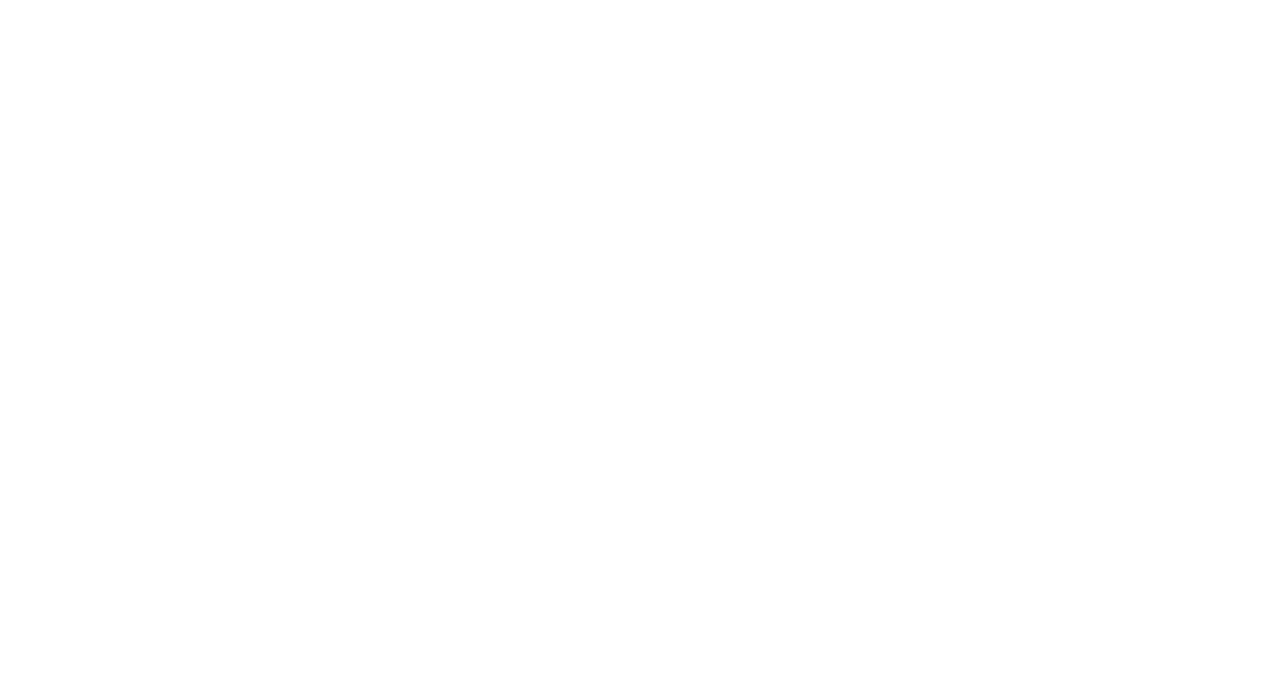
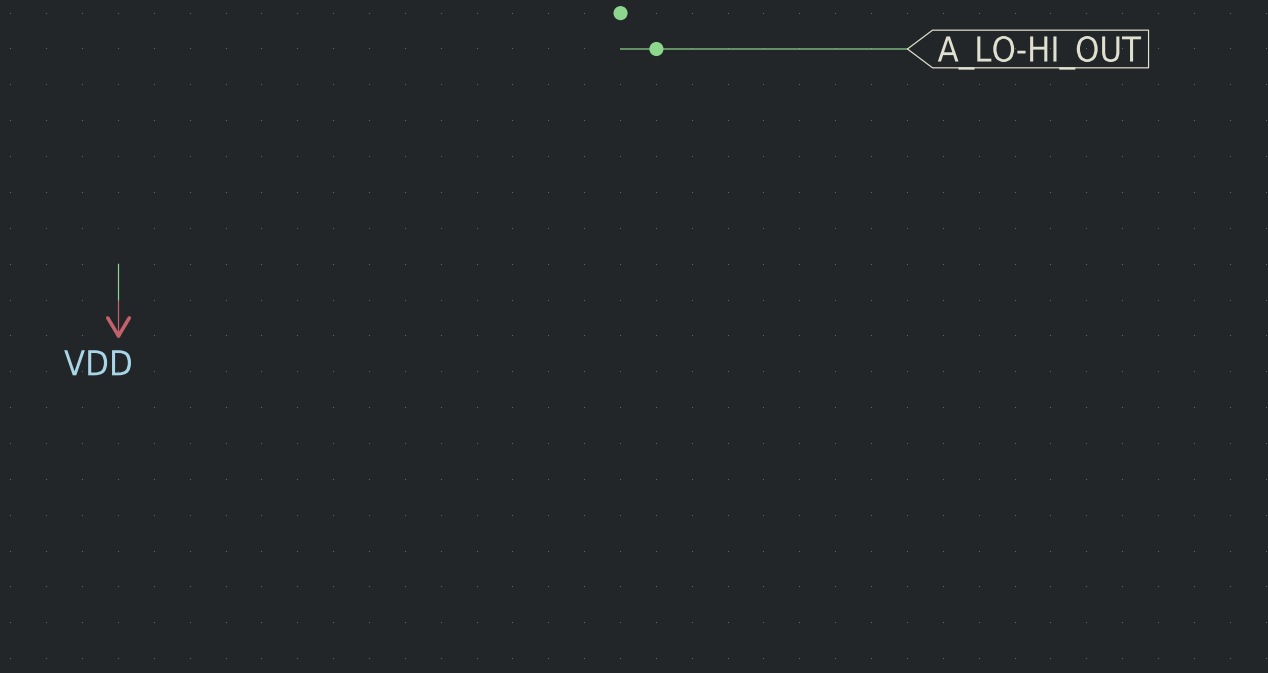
junction: none -> (620, 13)
wire: none -> (620, 48) (907, 48)
junction: none -> (656, 48)
global label: none -> A_LO-HI_OUT (1039, 52)
wire: none -> (118, 264) (118, 300)
power symbol: none -> VDD (118, 318)

